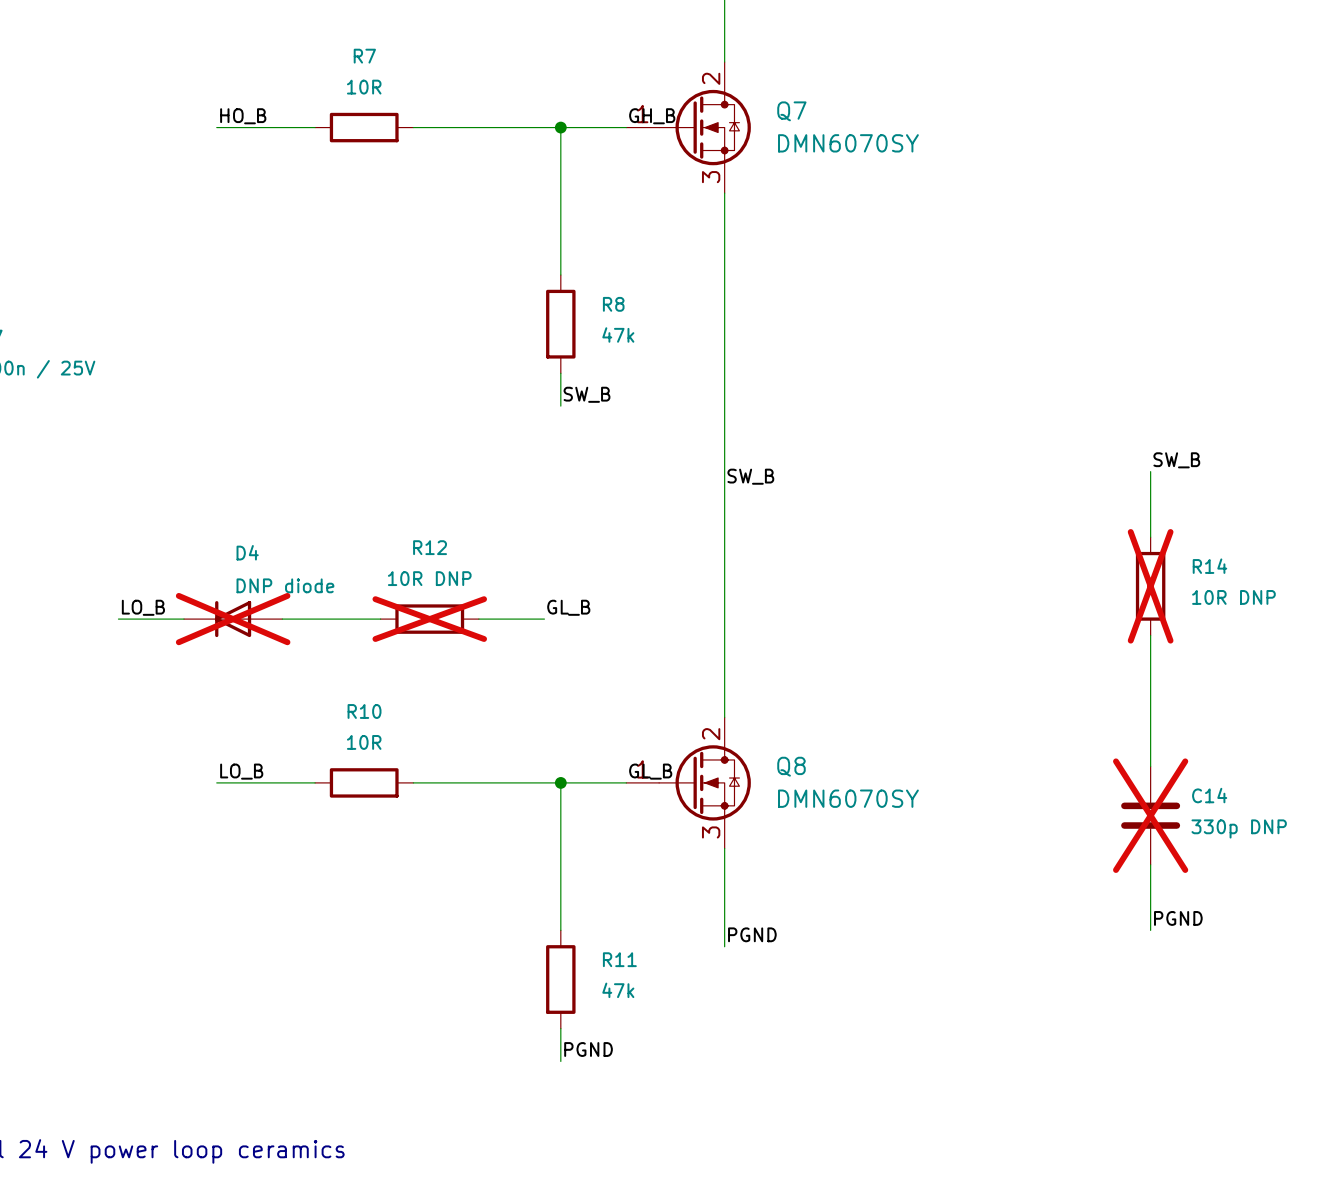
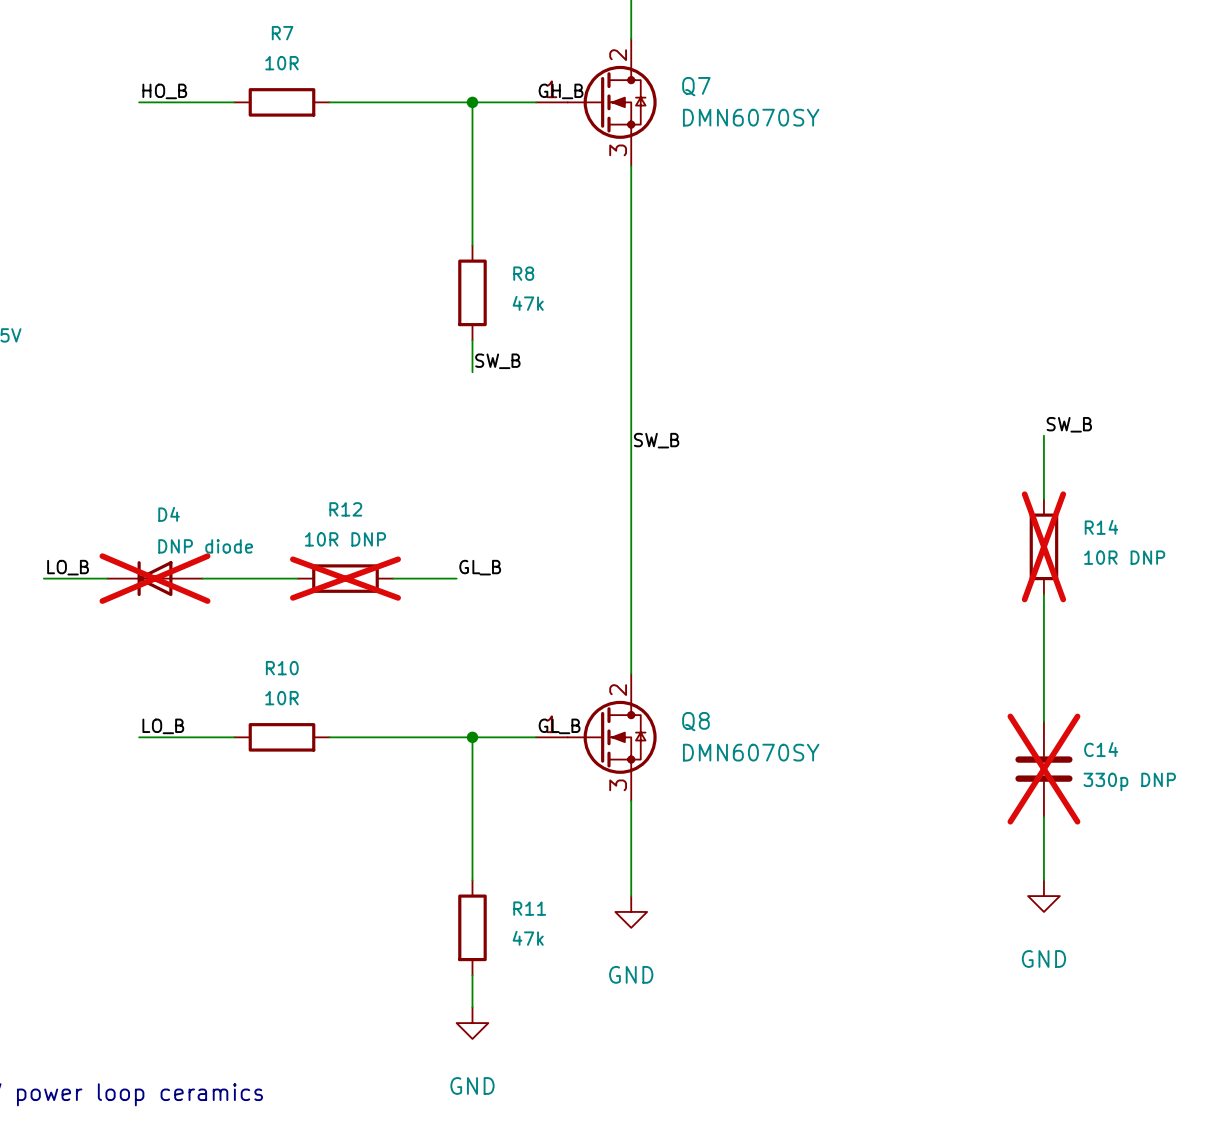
label: PGND (1178, 918) -> none
label: PGND (752, 934) -> none
power symbol: none -> GND (1043, 896)
power symbol: none -> GND (631, 911)
label: PGND (588, 1049) -> none
power symbol: none -> GND (472, 1023)

